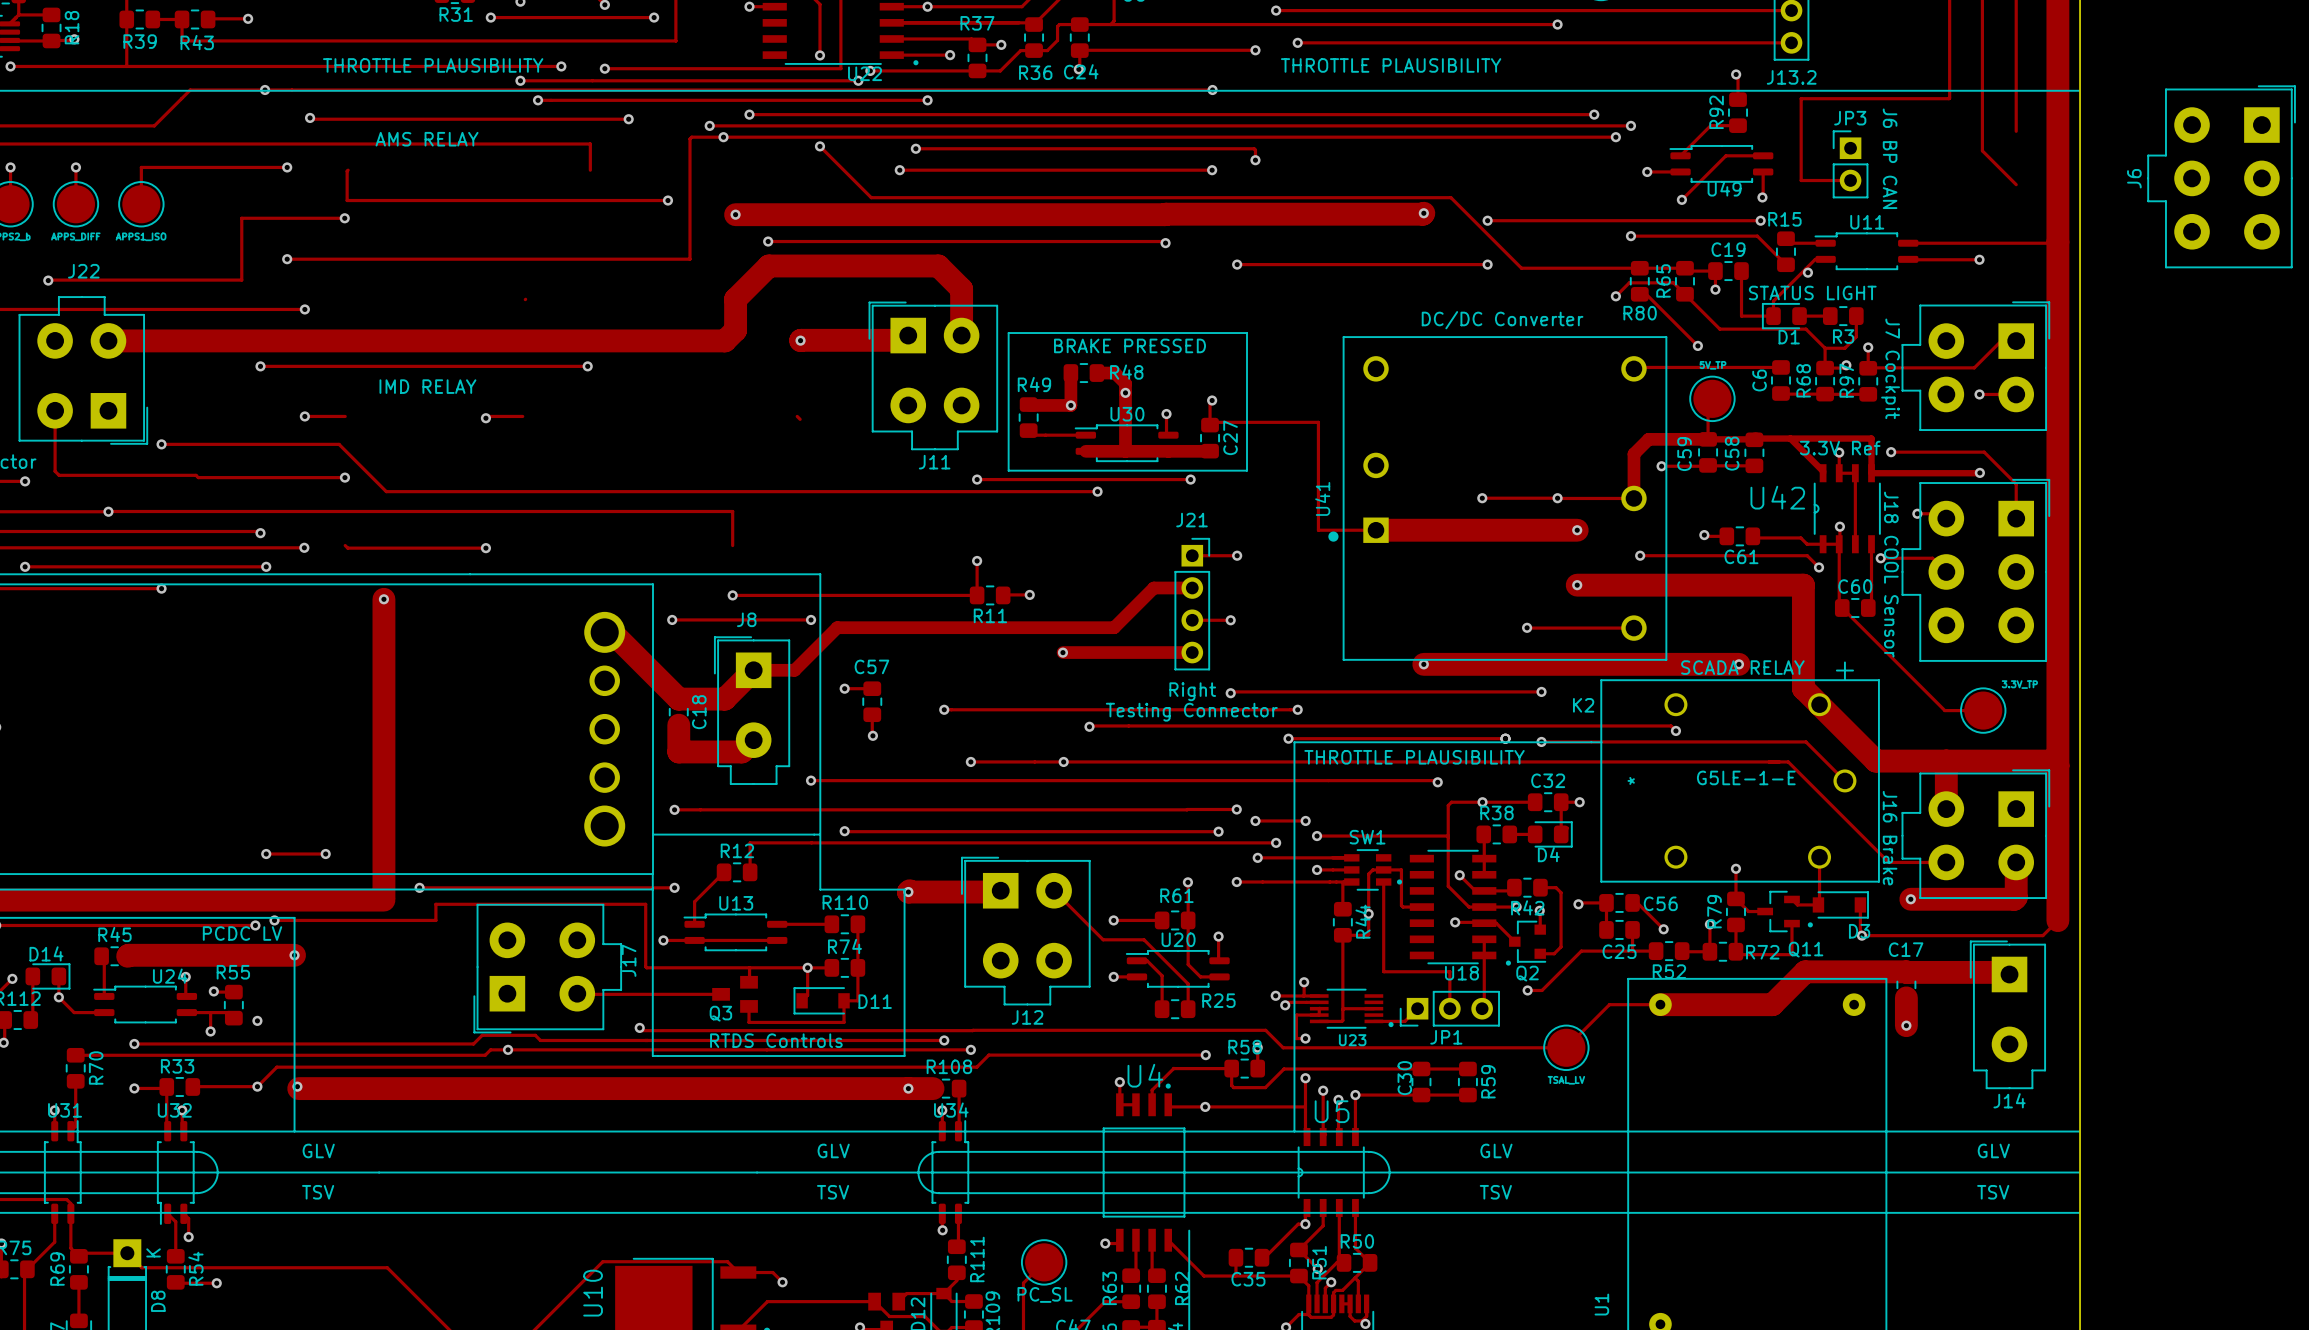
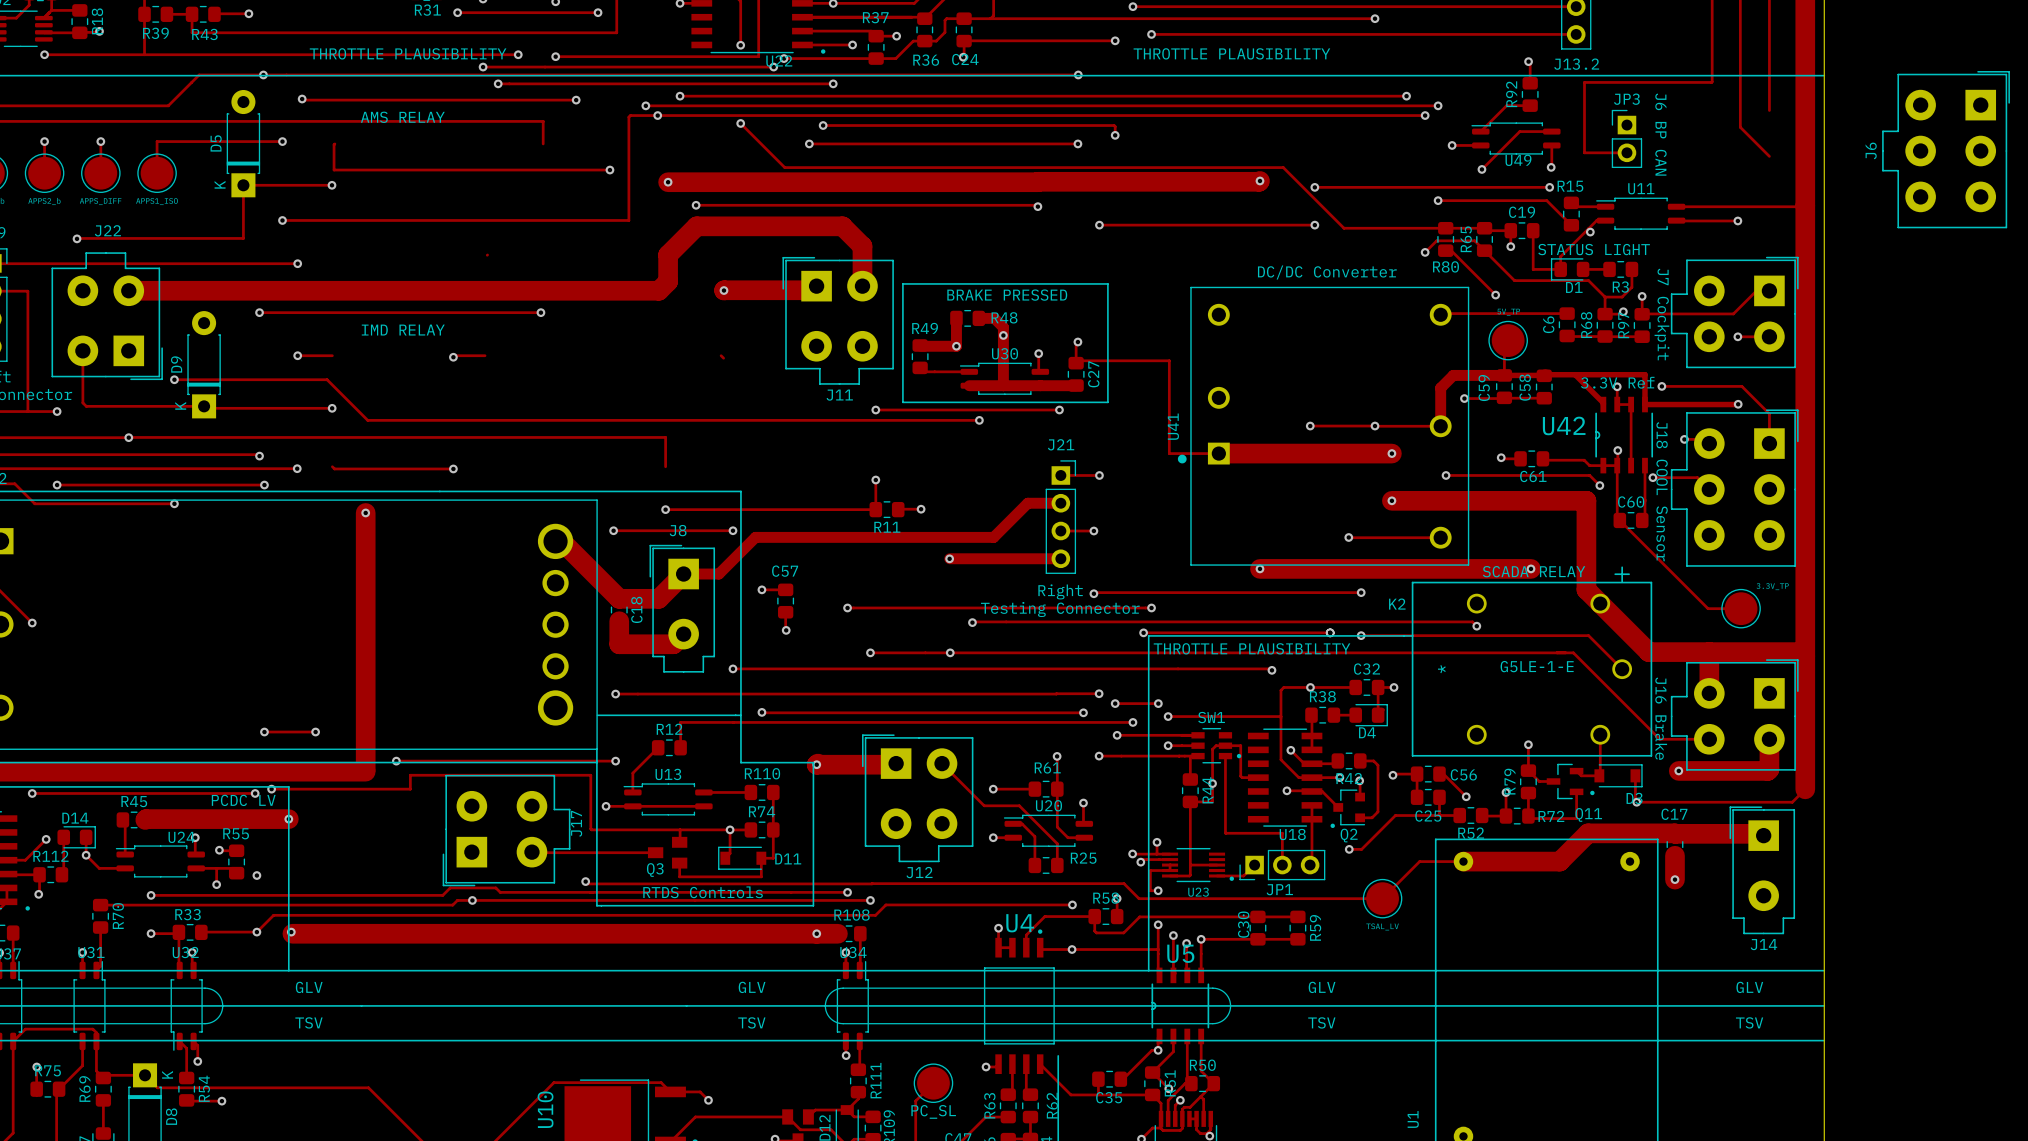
D5: none -> (243, 143)
D9: none -> (204, 364)

